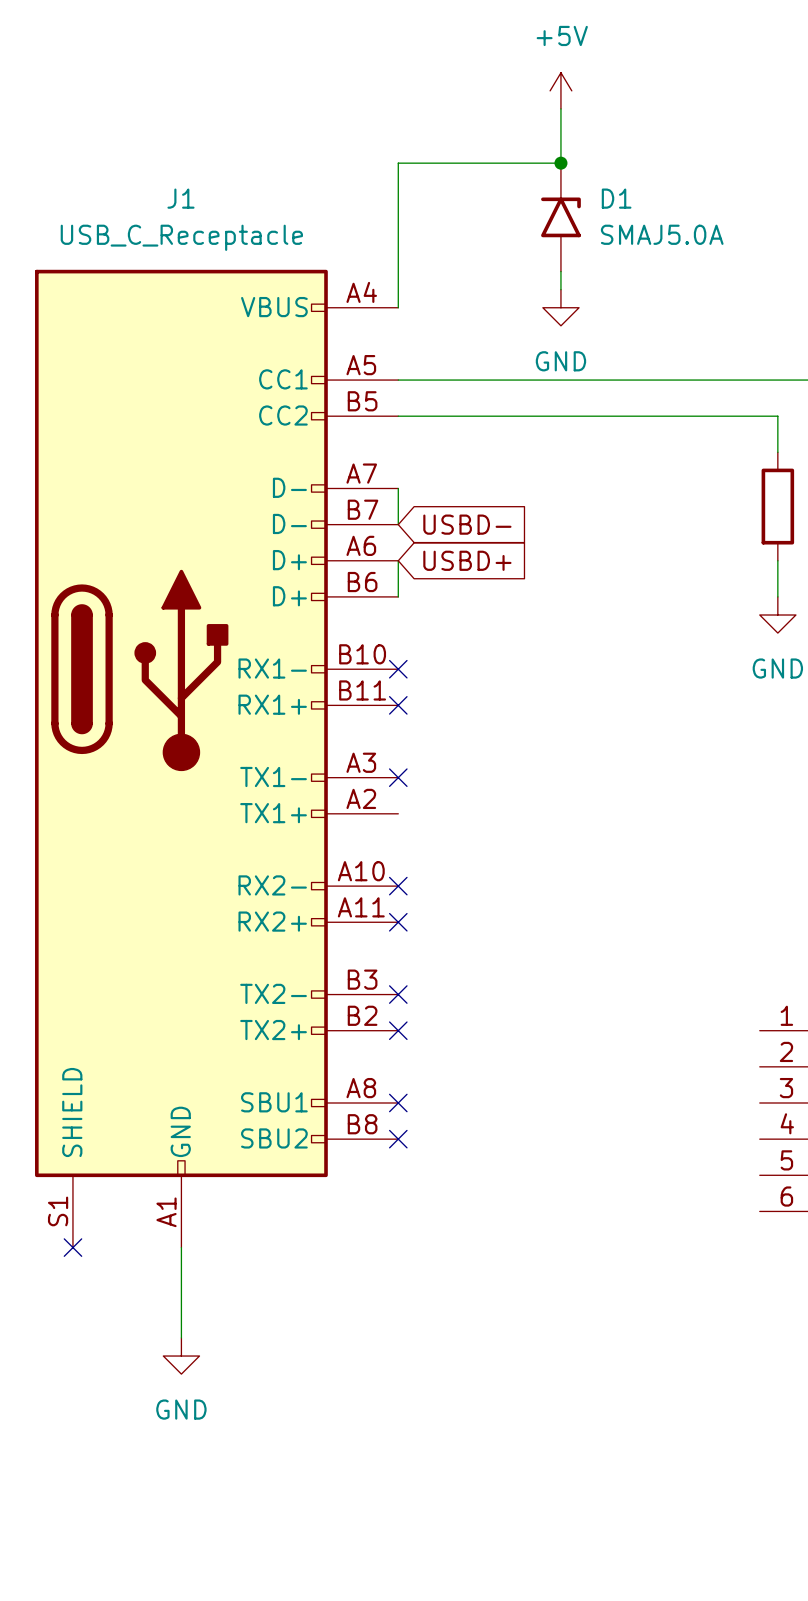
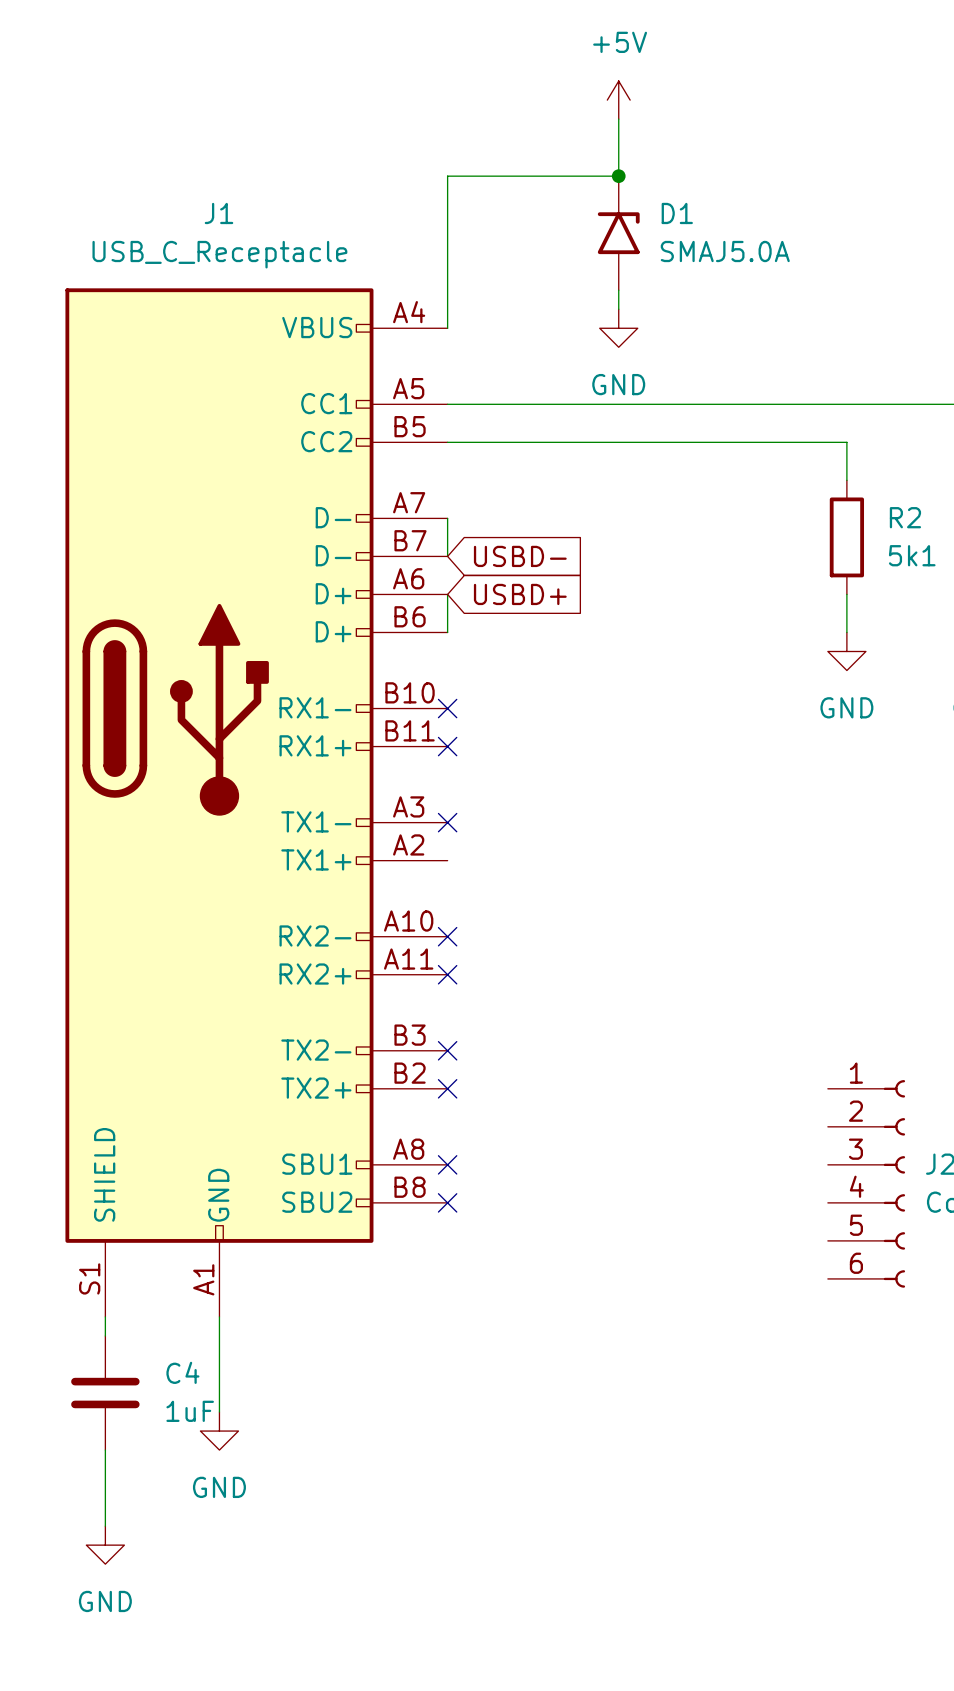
wire: none -> (105, 1316) (105, 1335)
no-connect mark: (72, 1247) -> none
C4: none -> 1uF (105, 1393)
wire: none -> (105, 1450) (105, 1526)
power symbol: none -> GND (105, 1545)

